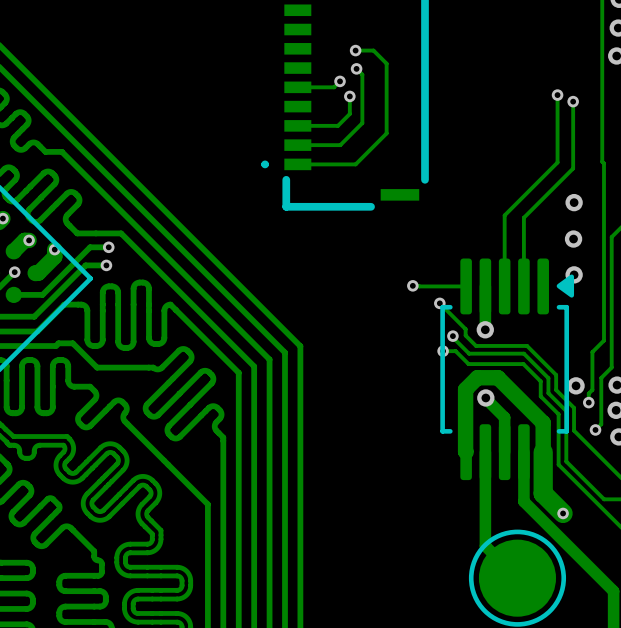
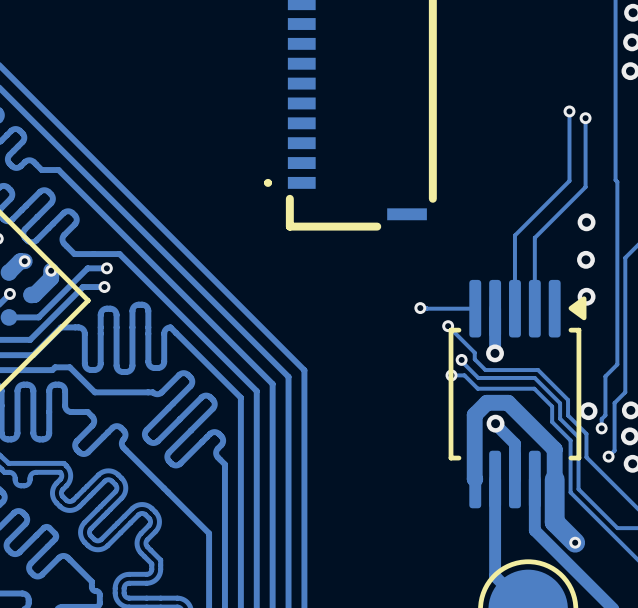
track: (355, 50) (373, 50) (386, 63) (386, 133) (355, 164) (297, 164) -> none
via: (355, 50) -> none
track: (356, 68) (362, 74) (362, 123) (340, 145) (297, 145) -> none
via: (356, 68) -> none
track: (340, 81) (334, 87) (297, 87) -> none
via: (340, 81) -> none
track: (349, 96) (349, 113) (337, 125) (297, 125) -> none
via: (349, 96) -> none

